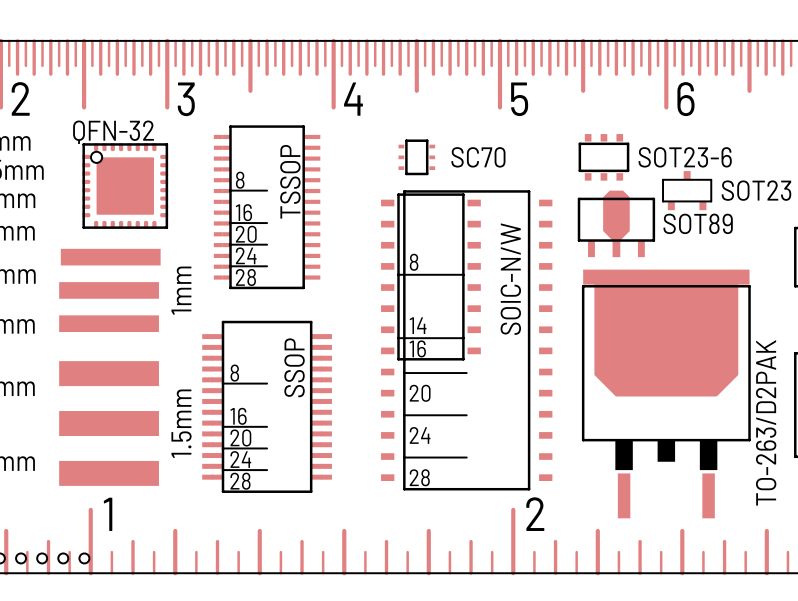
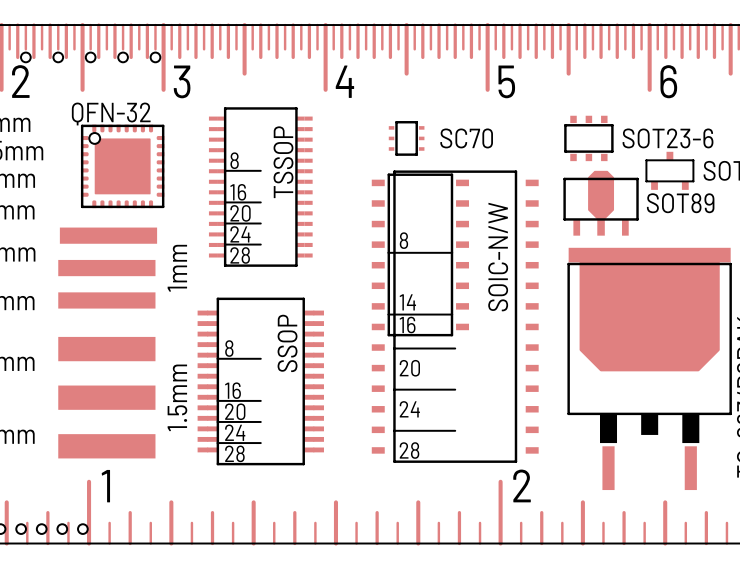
hole: none -> (25, 57)
hole: none -> (58, 57)
hole: none -> (90, 57)
hole: none -> (123, 57)
hole: none -> (155, 57)

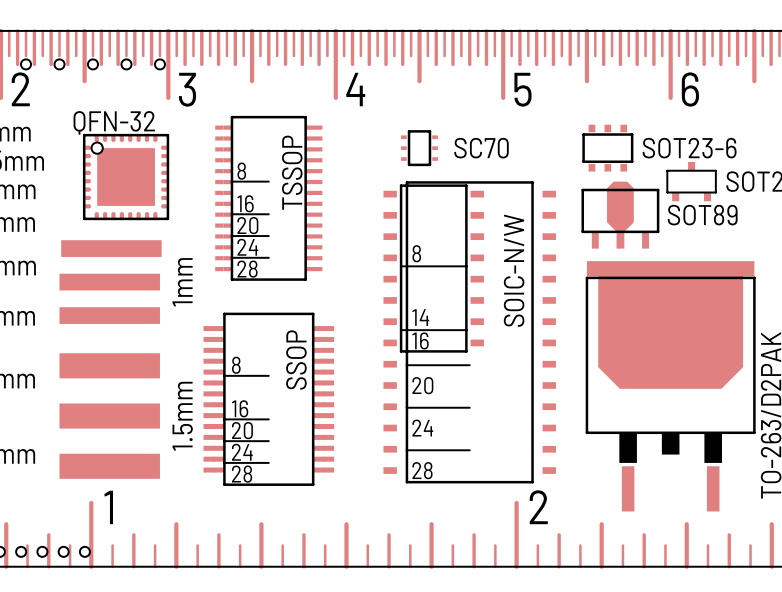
top track: (82, 73) (82, 89) -> none

